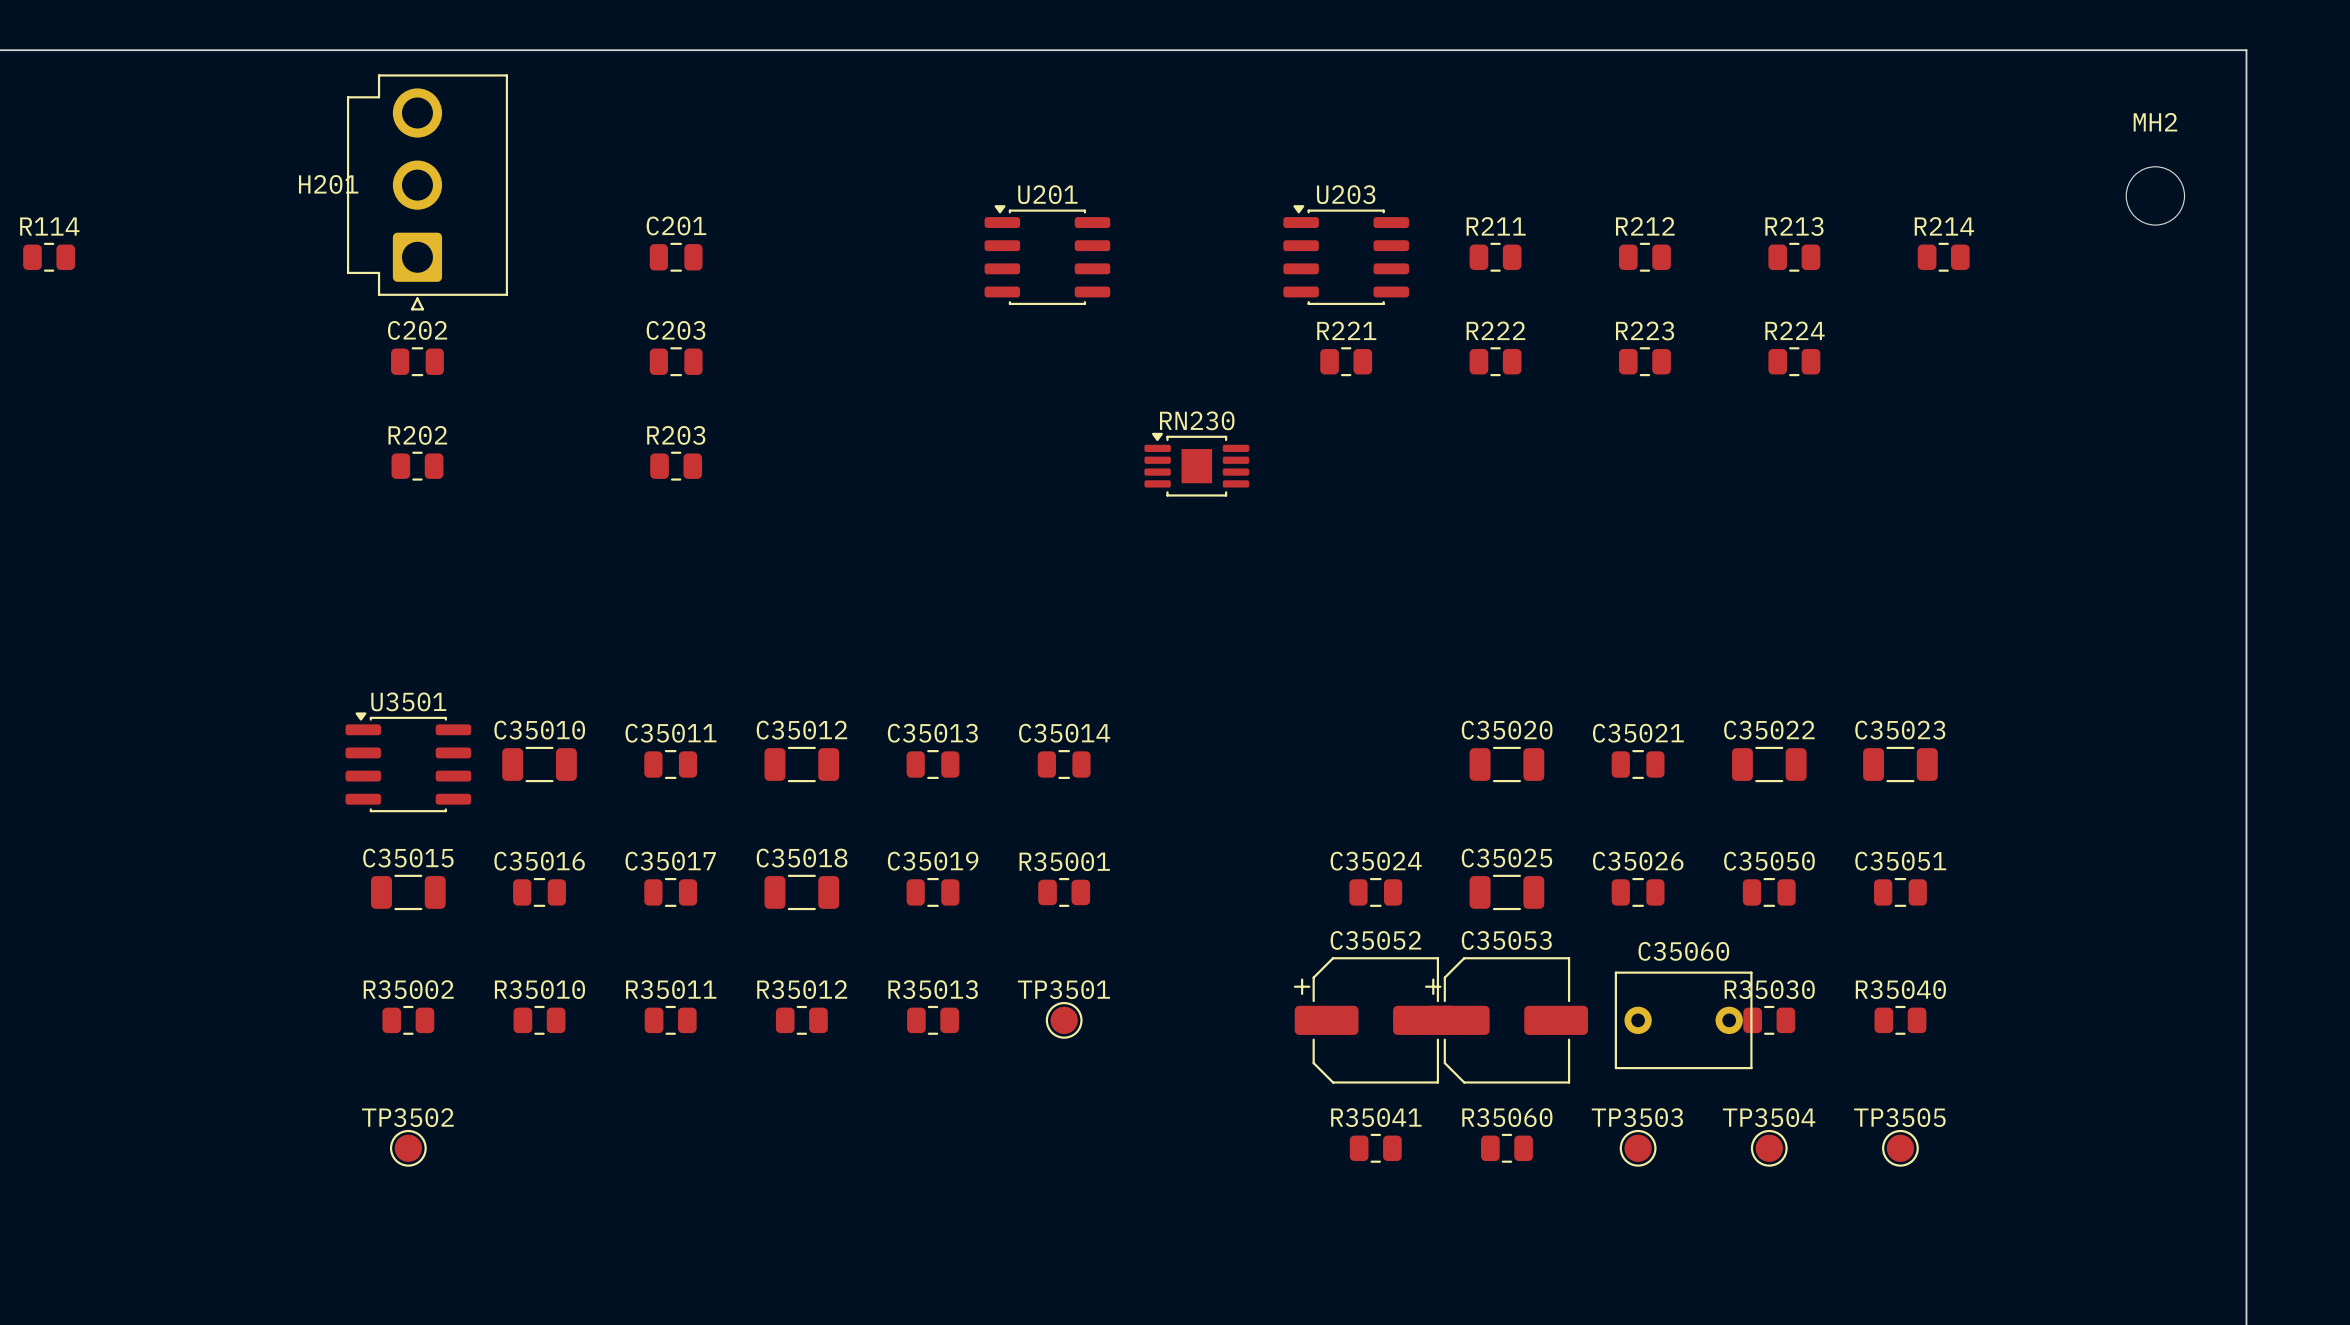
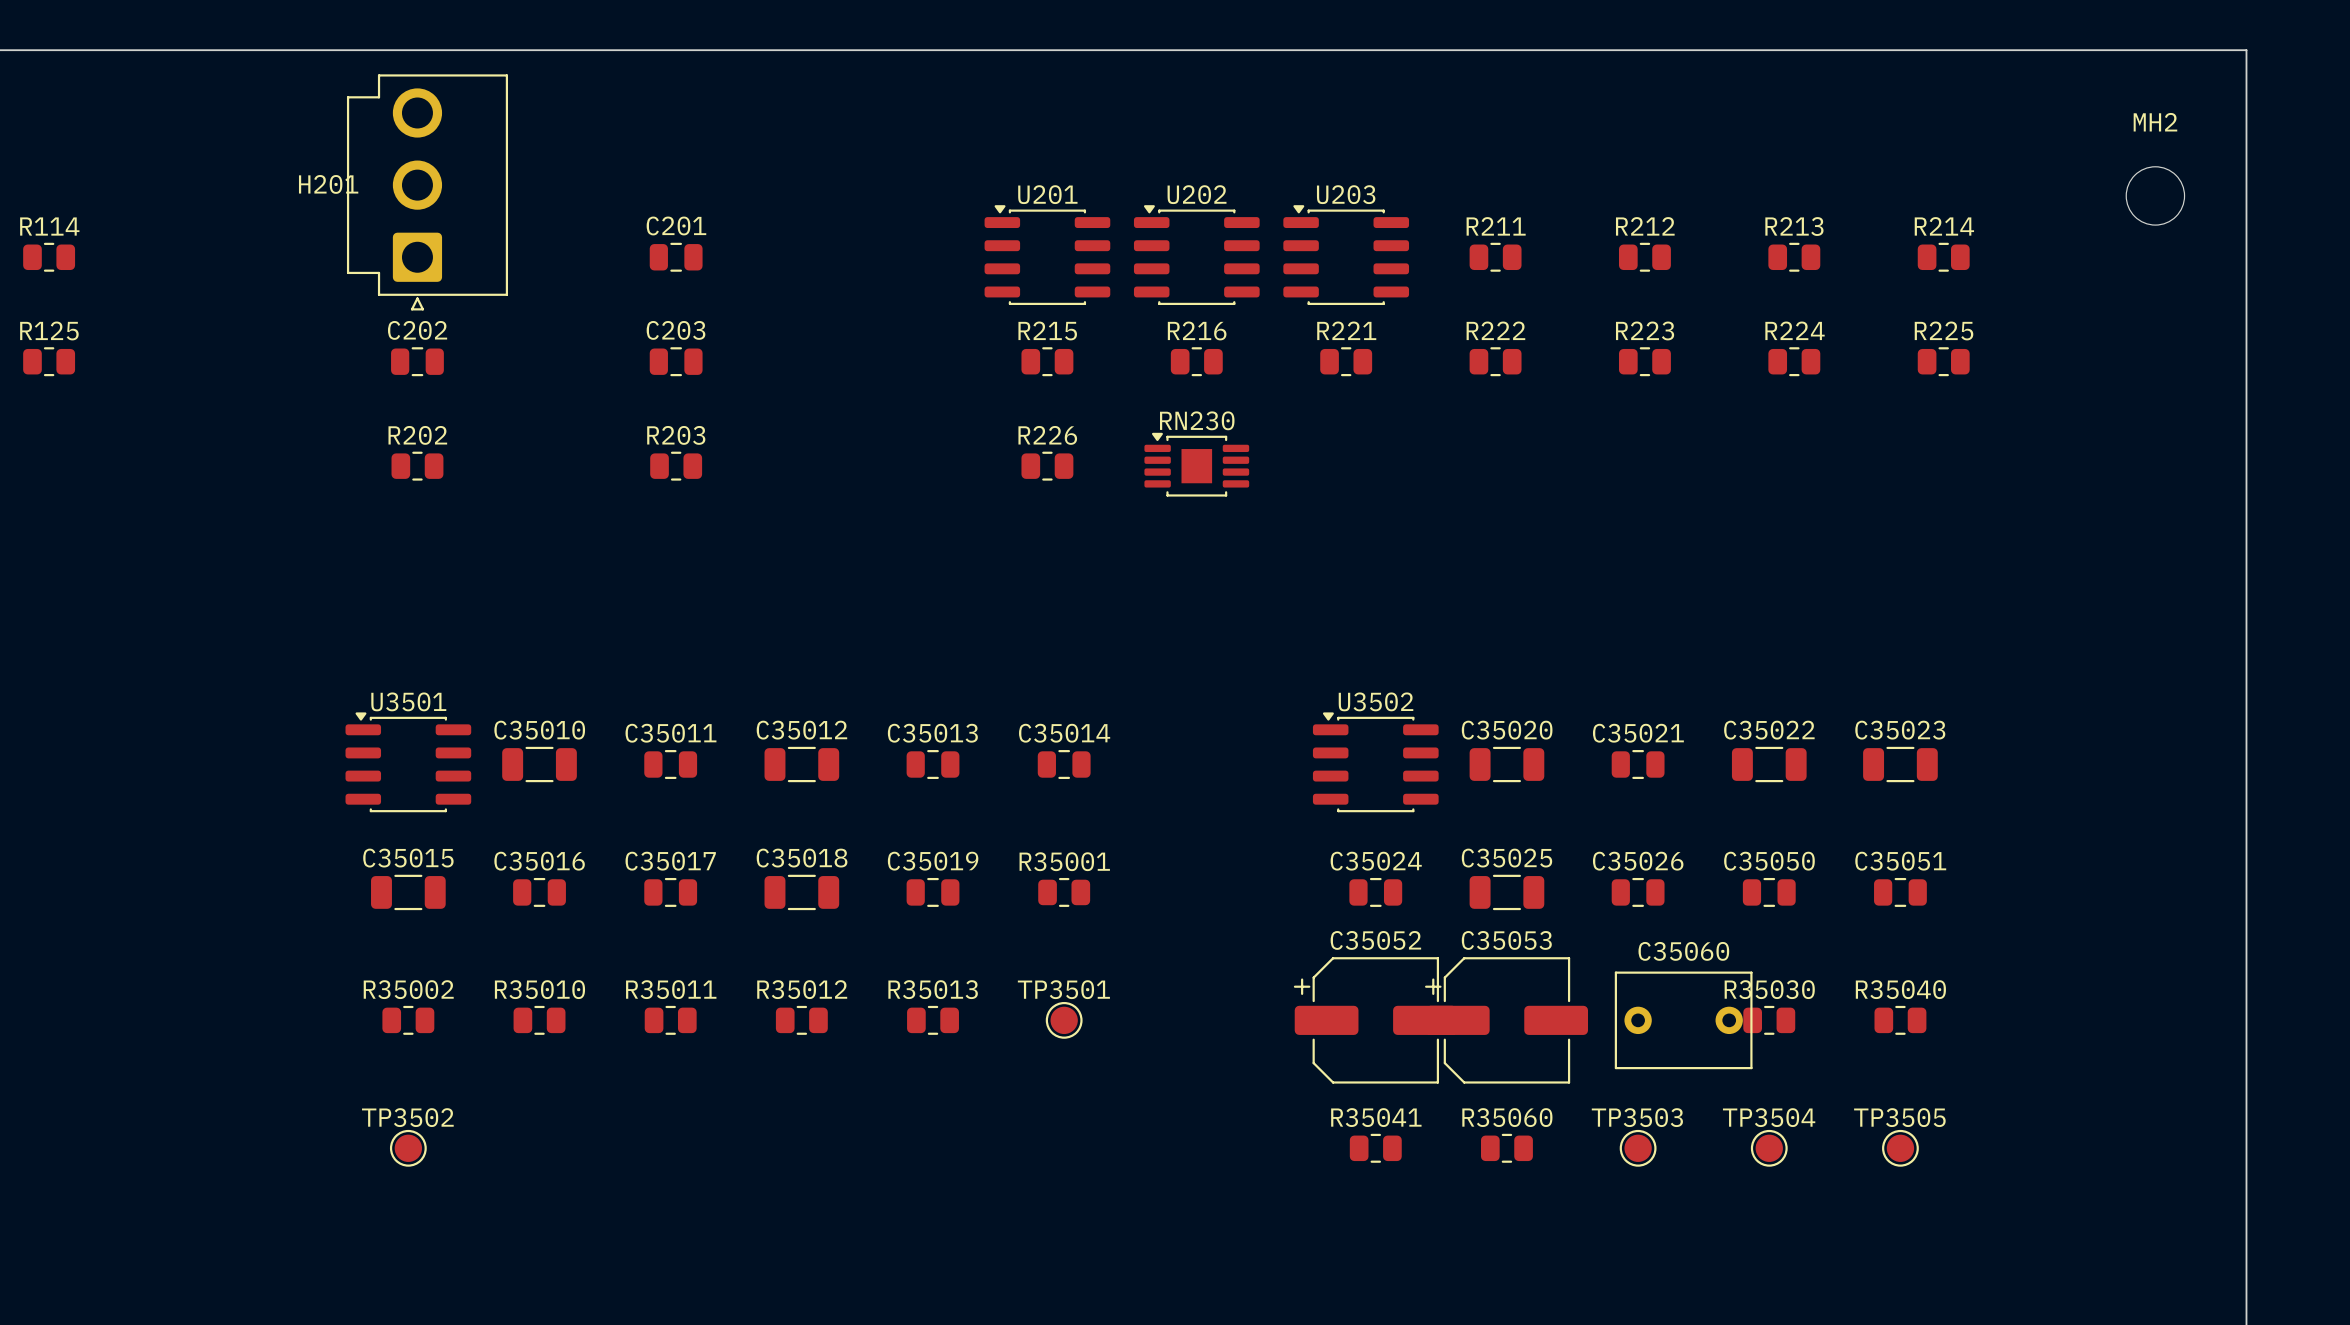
U202: none -> (1196, 255)
R125: none -> (49, 361)
R215: none -> (1047, 361)
R216: none -> (1196, 361)
R225: none -> (1943, 361)
R226: none -> (1047, 466)
U3502: none -> (1375, 762)

